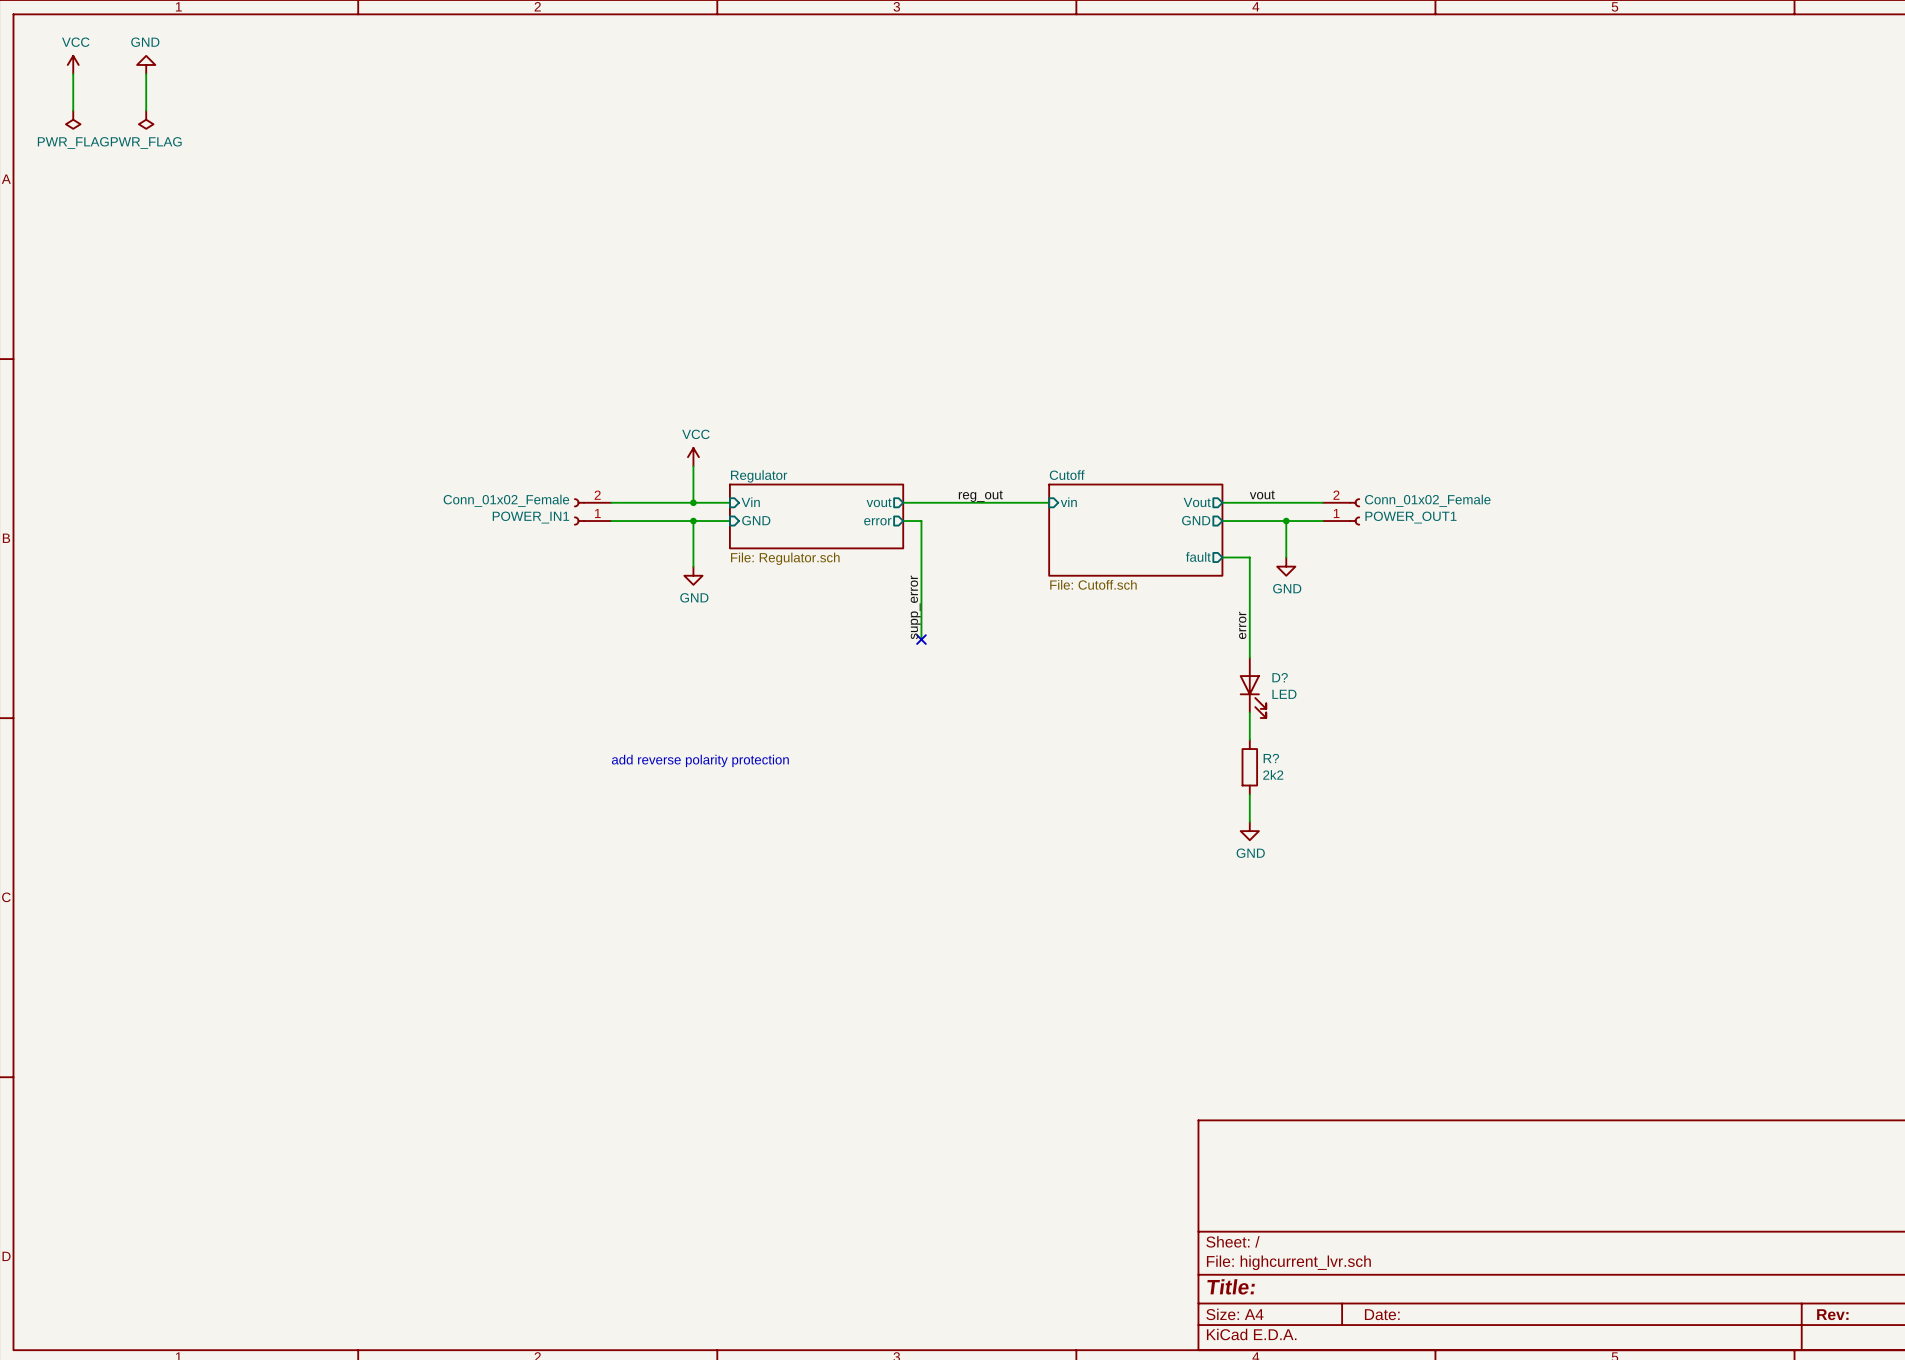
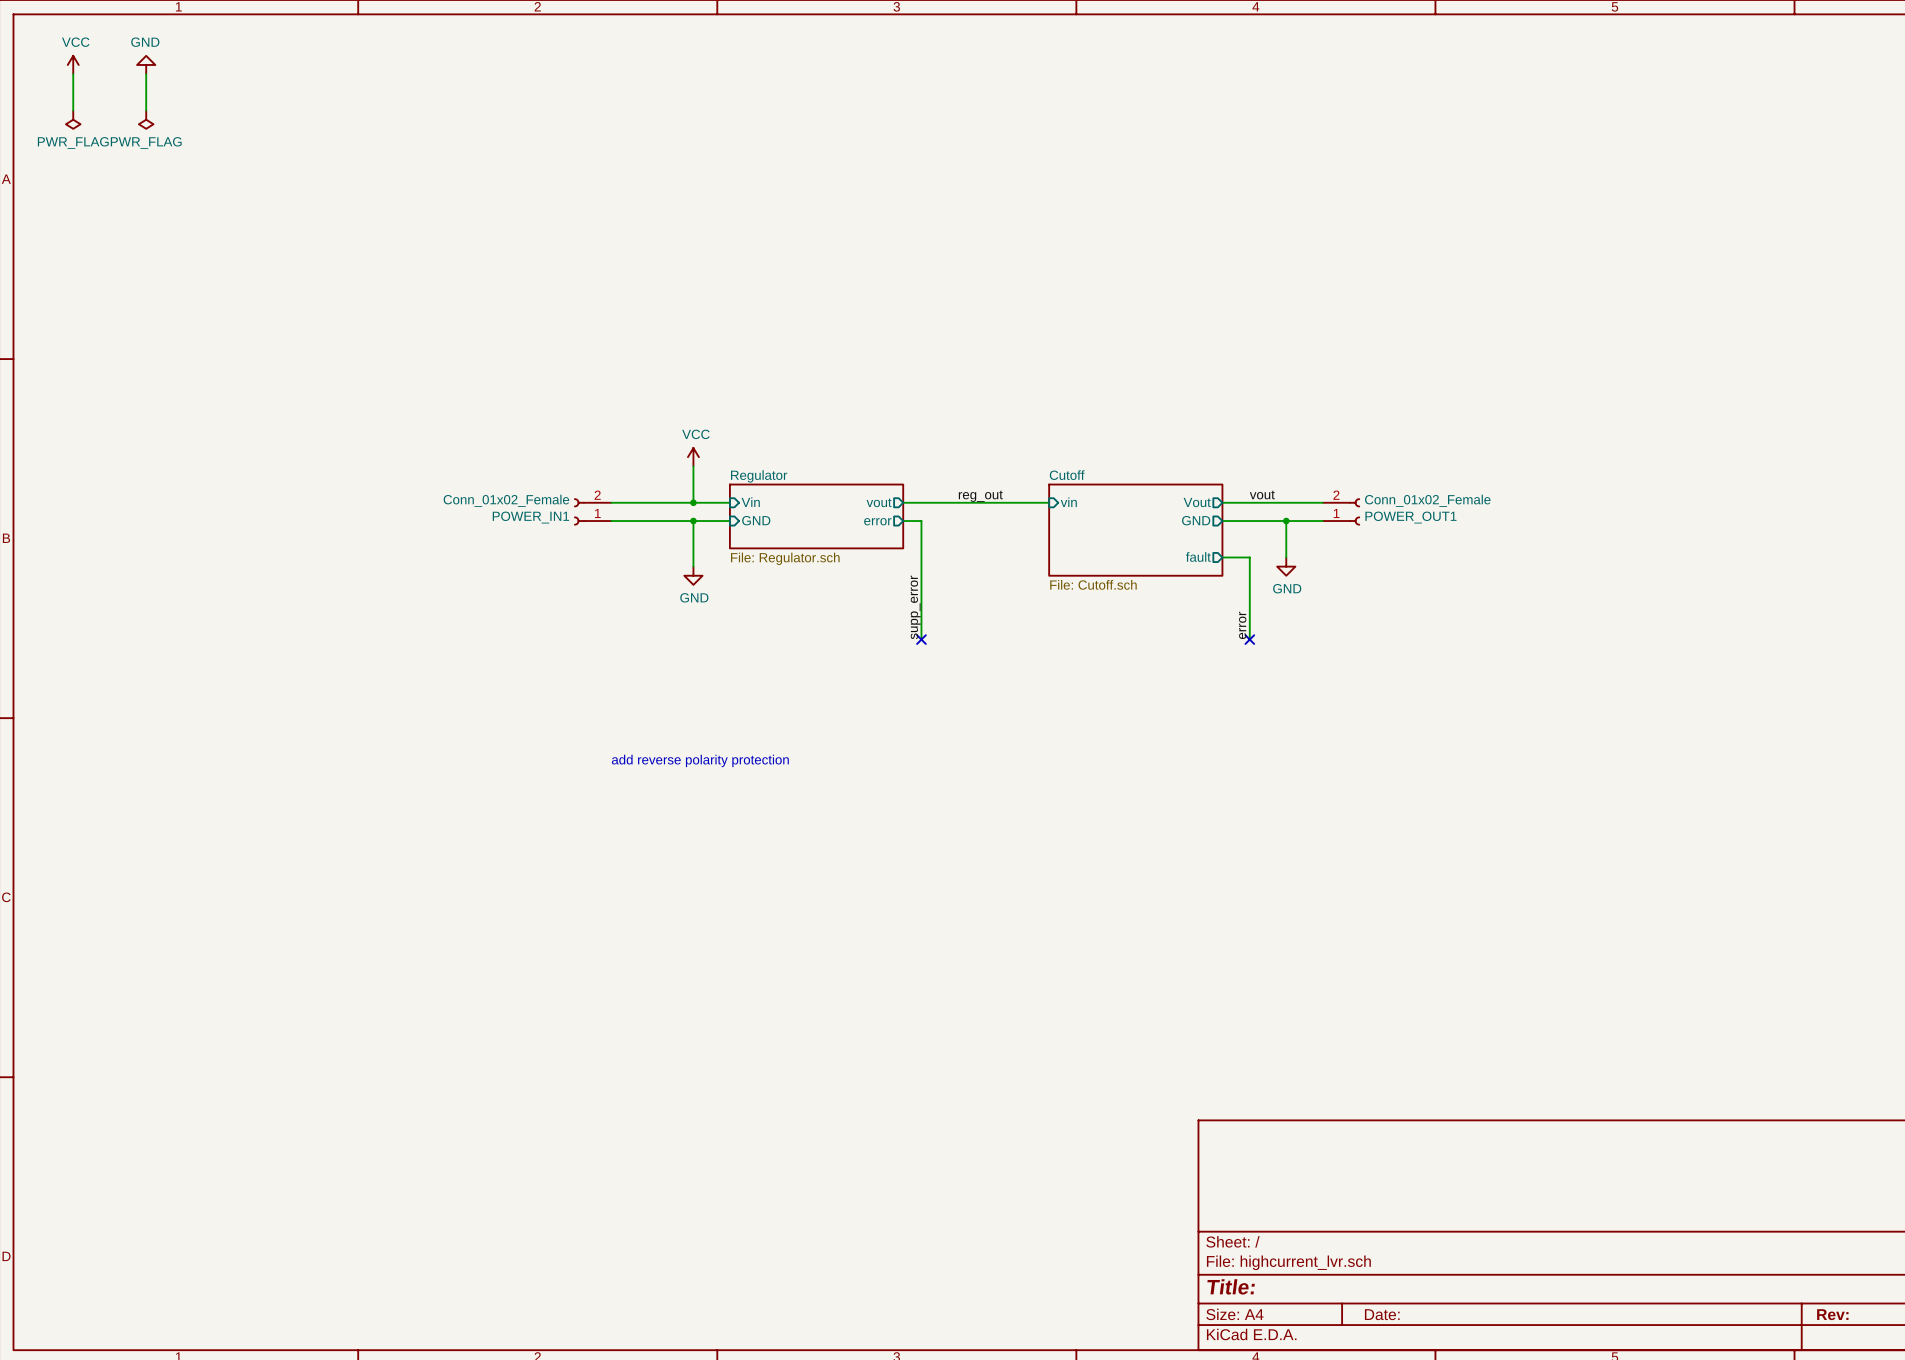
wire: (1249, 639) (1249, 657) -> none
no-connect mark: none -> (1249, 639)
D?: LED (1252, 687) -> none
wire: (1249, 712) (1249, 739) -> none
R?: 2k2 (1249, 767) -> none
wire: (1249, 794) (1249, 821) -> none
power symbol: GND (1249, 831) -> none

